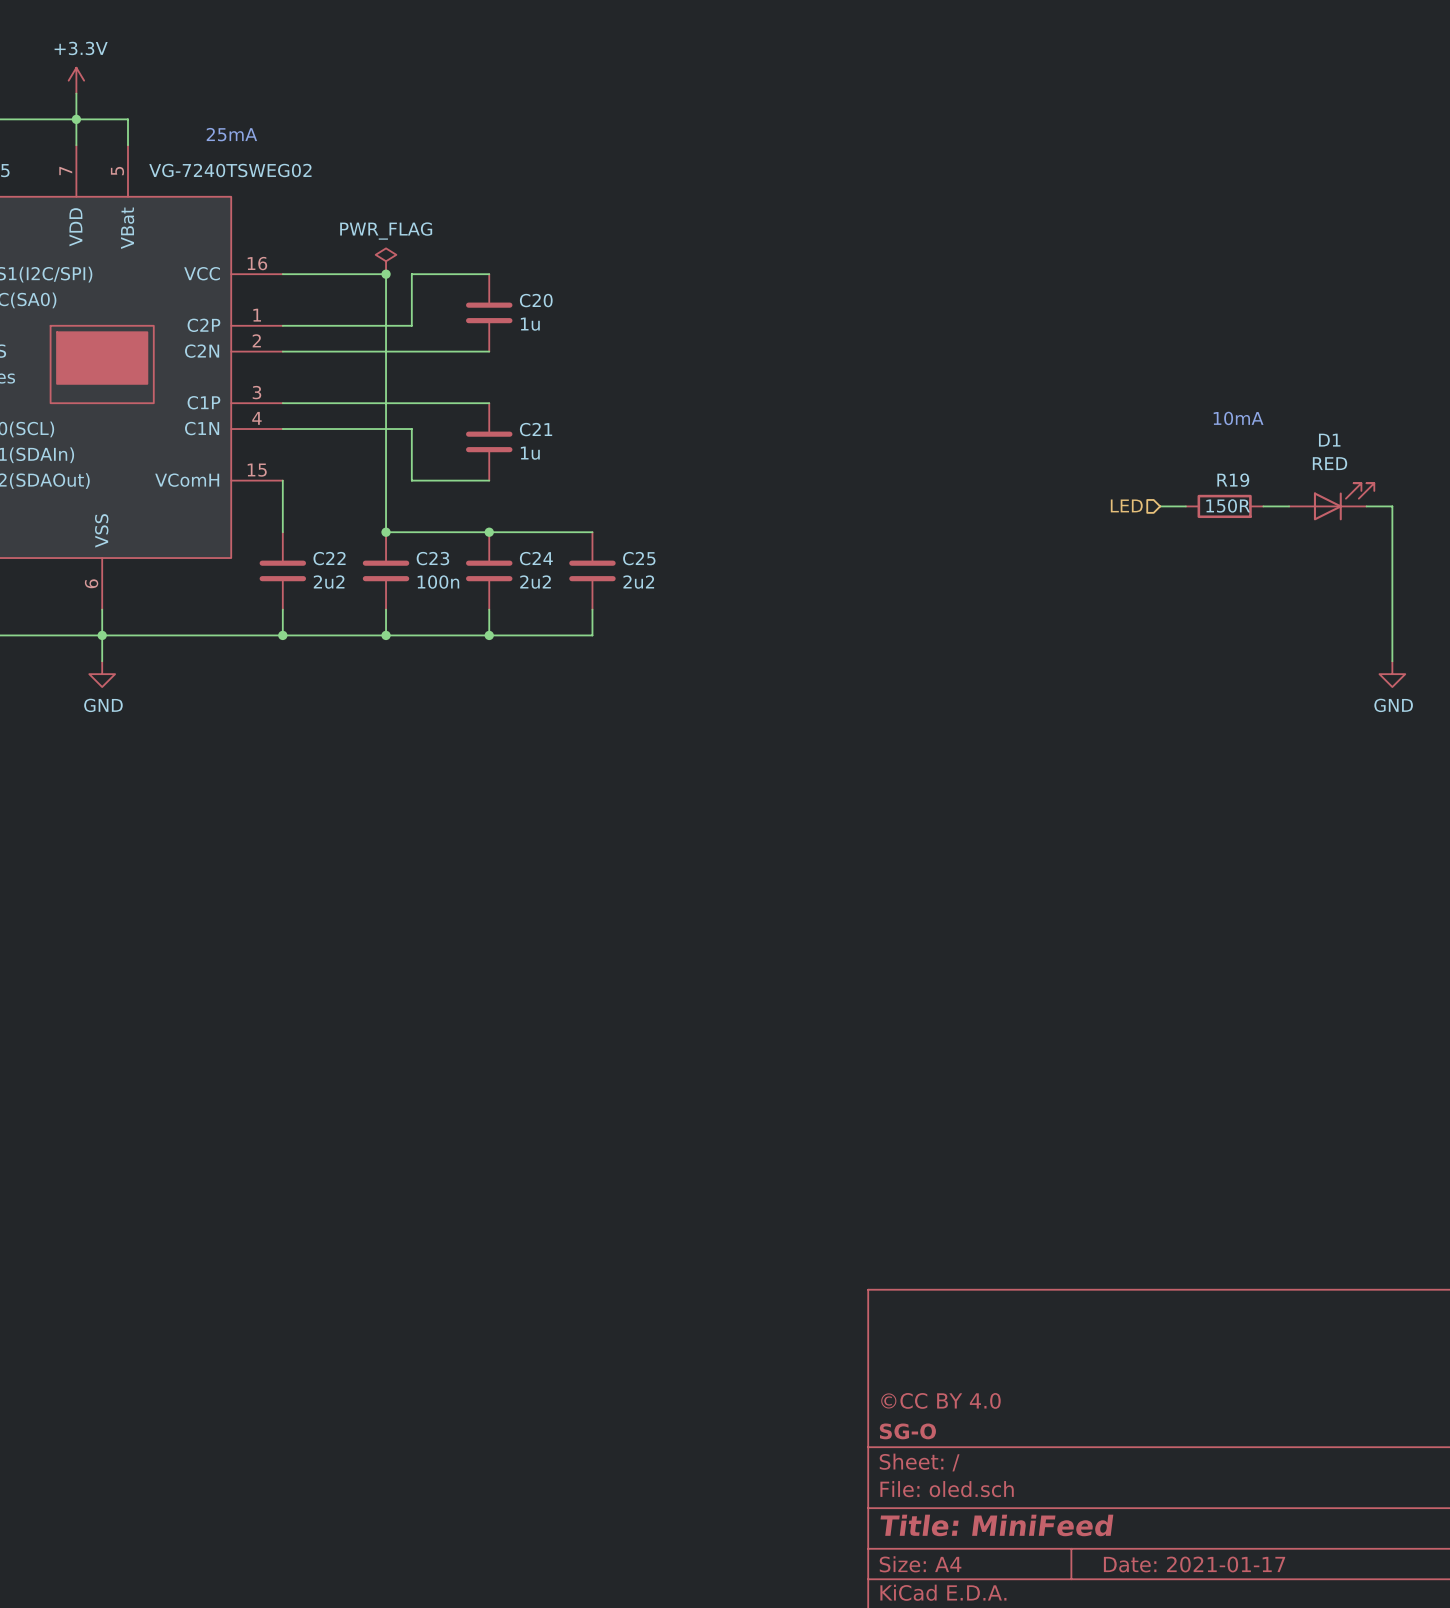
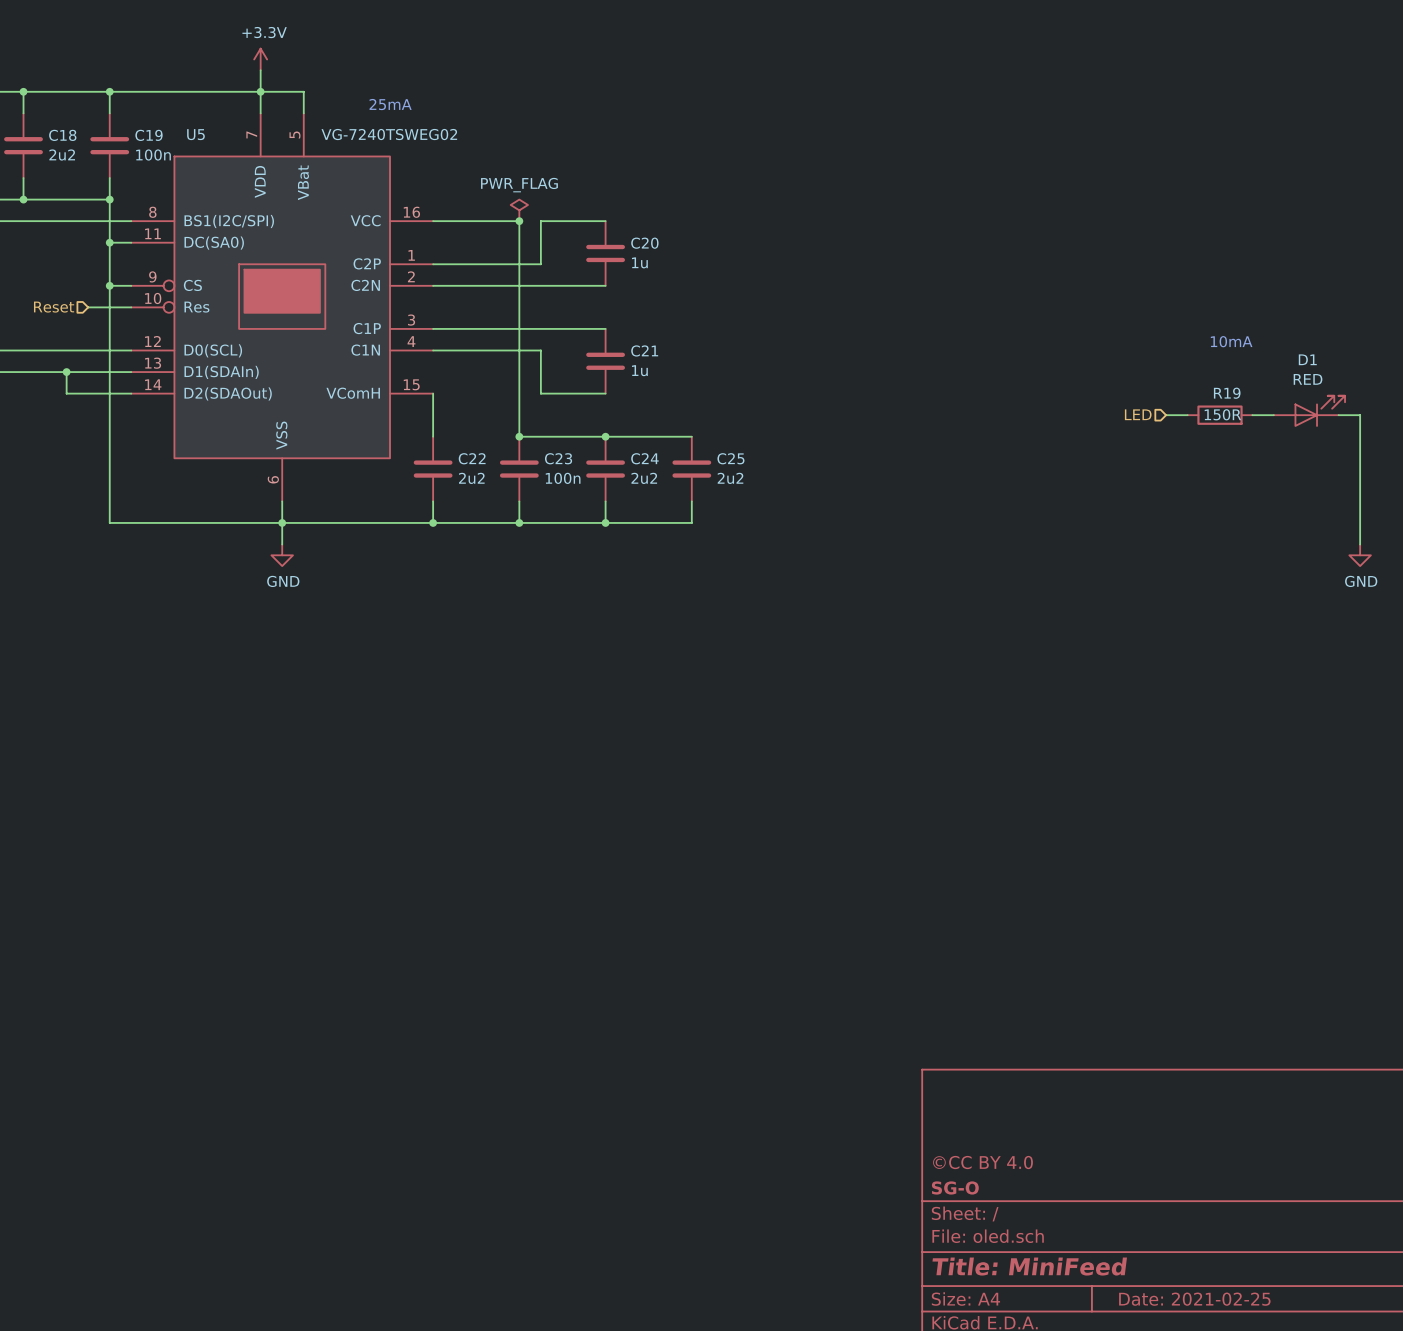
title block: Date: 2021-01-17 (1194, 1564) -> Date: 2021-02-25 (1194, 1299)

